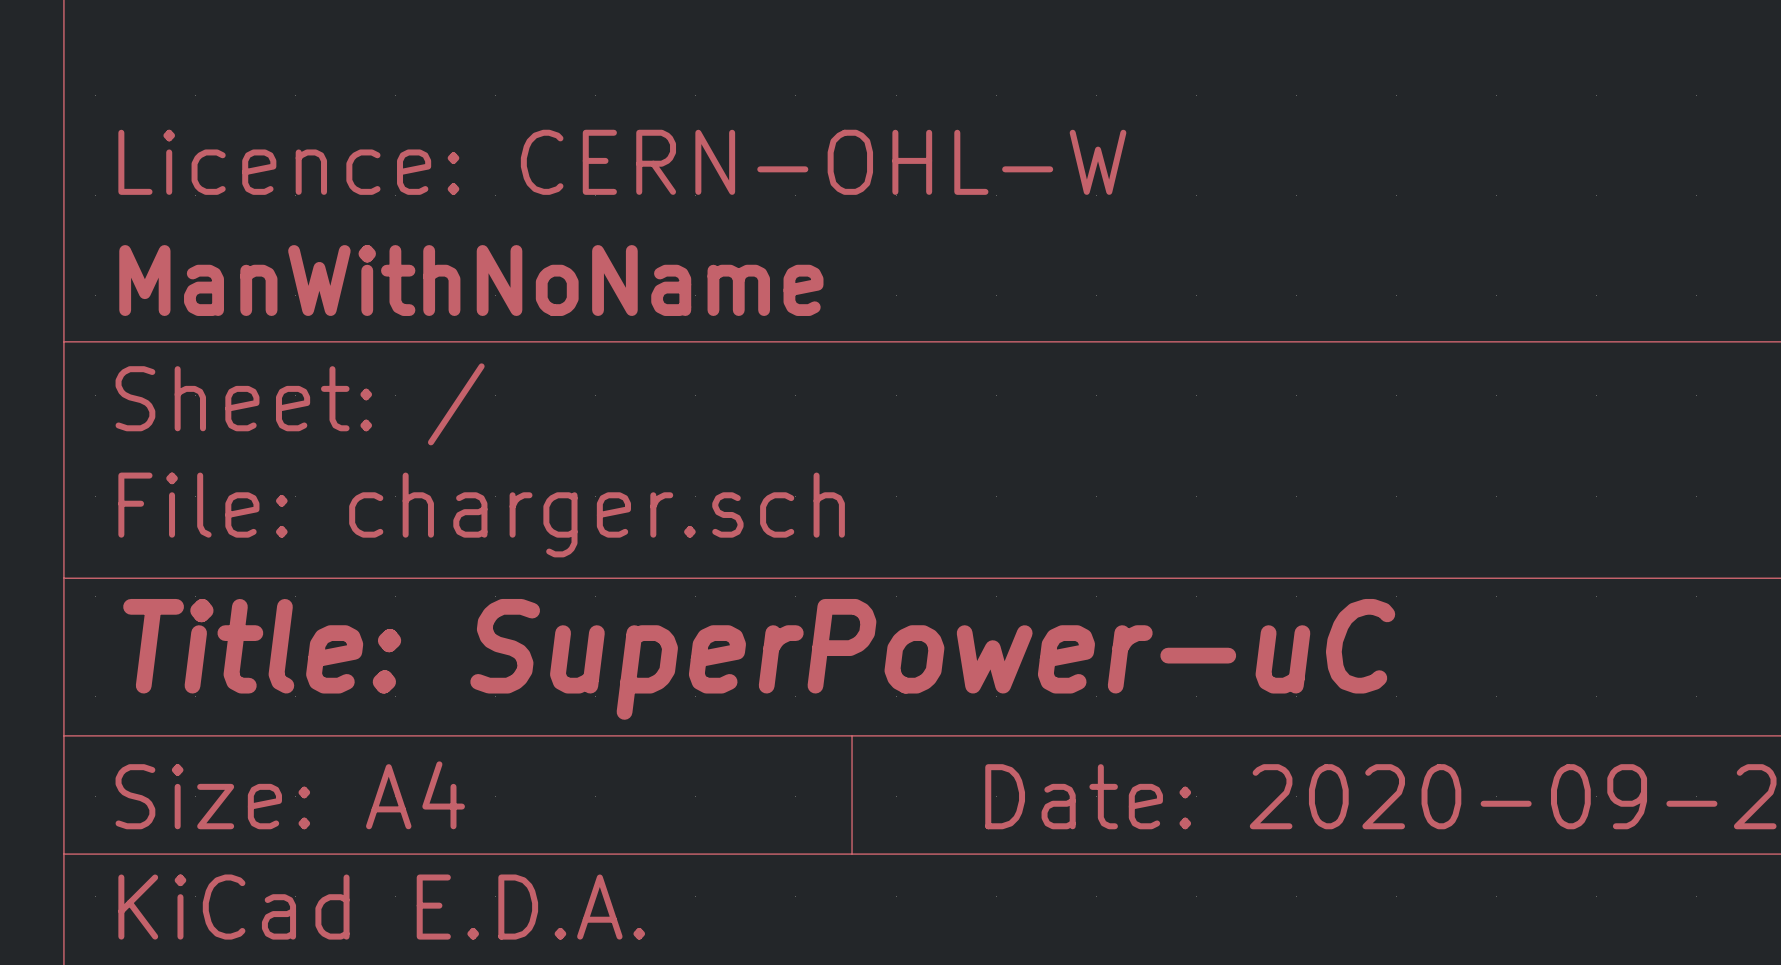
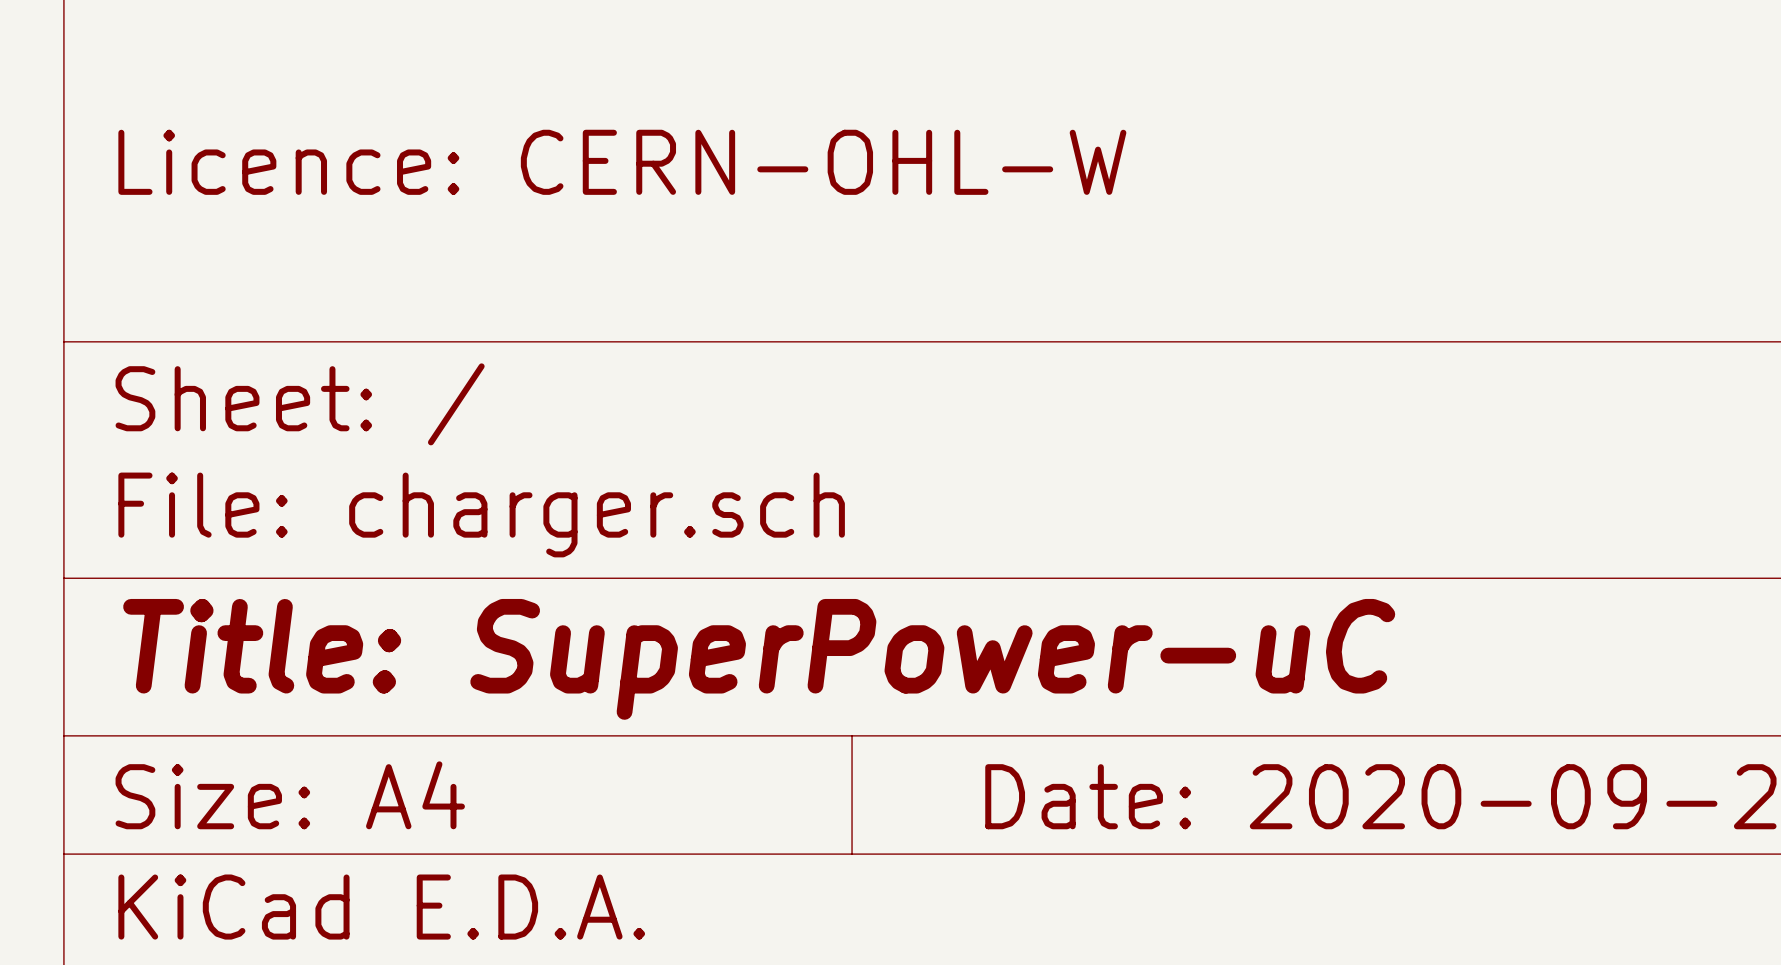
title block: ManWithNoName (471, 280) -> none

